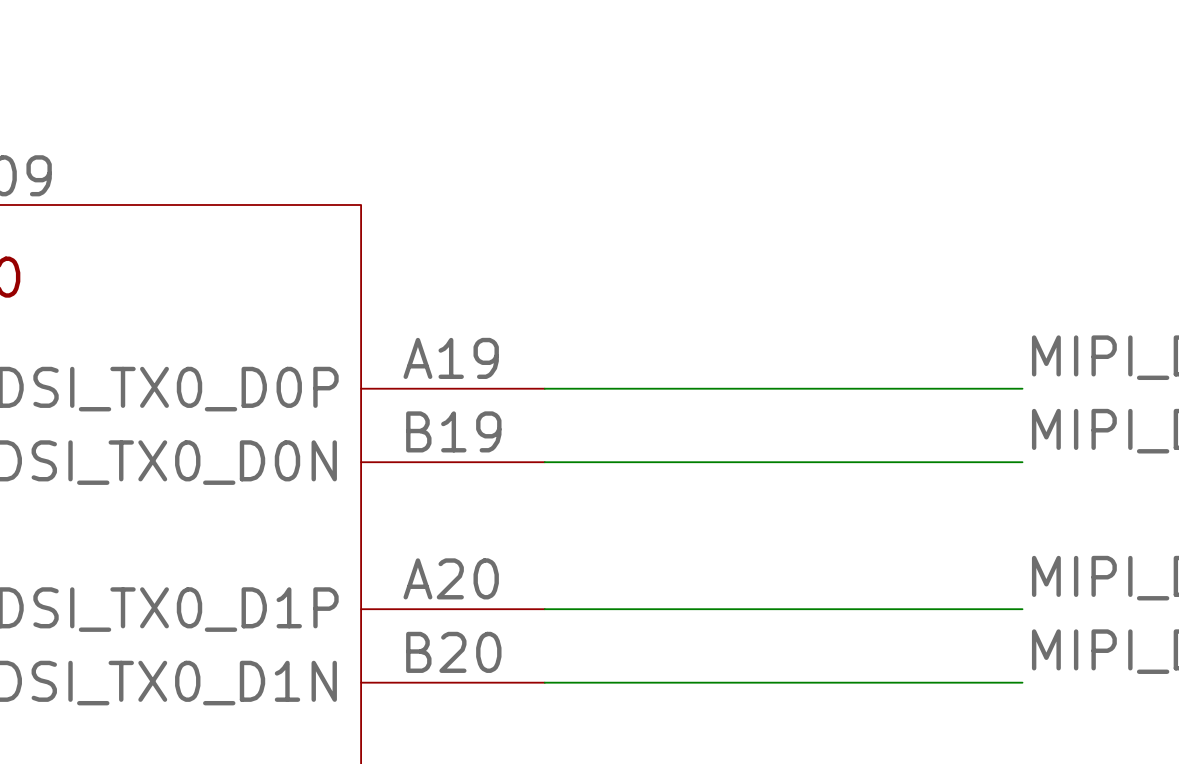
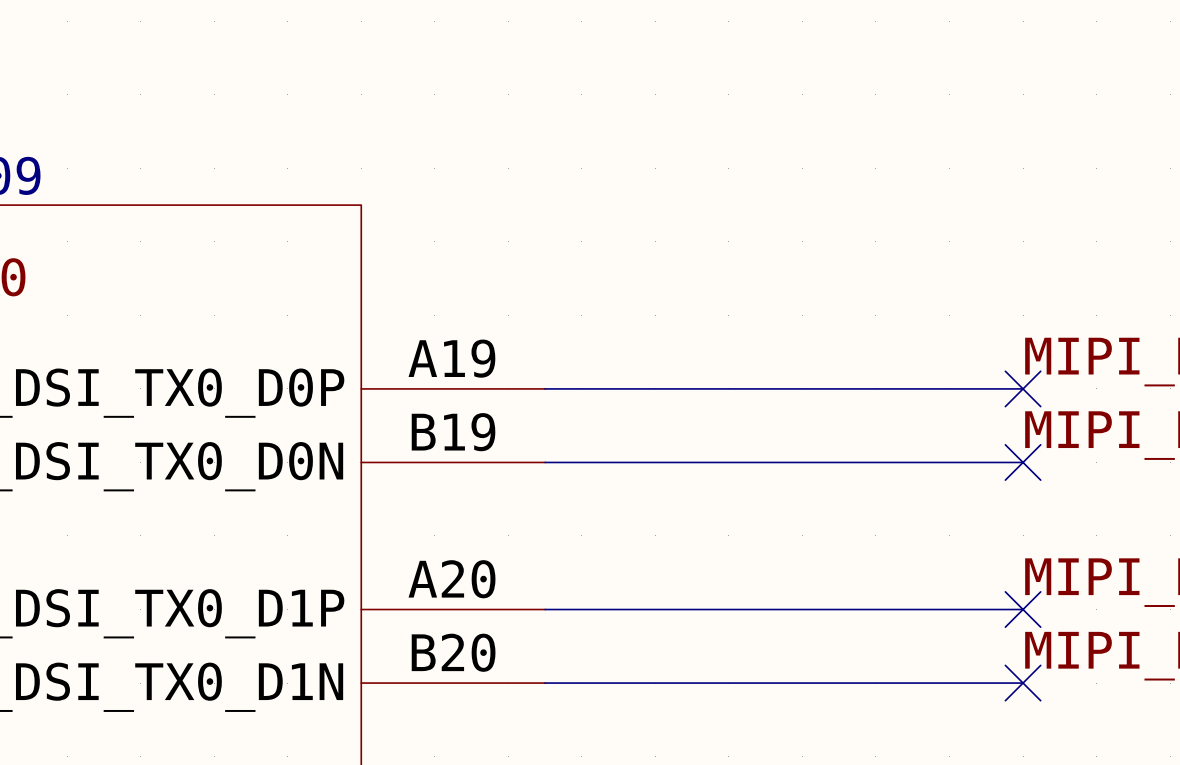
no-connect mark: none -> (1023, 388)
no-connect mark: none -> (1023, 462)
no-connect mark: none -> (1023, 609)
no-connect mark: none -> (1023, 683)

